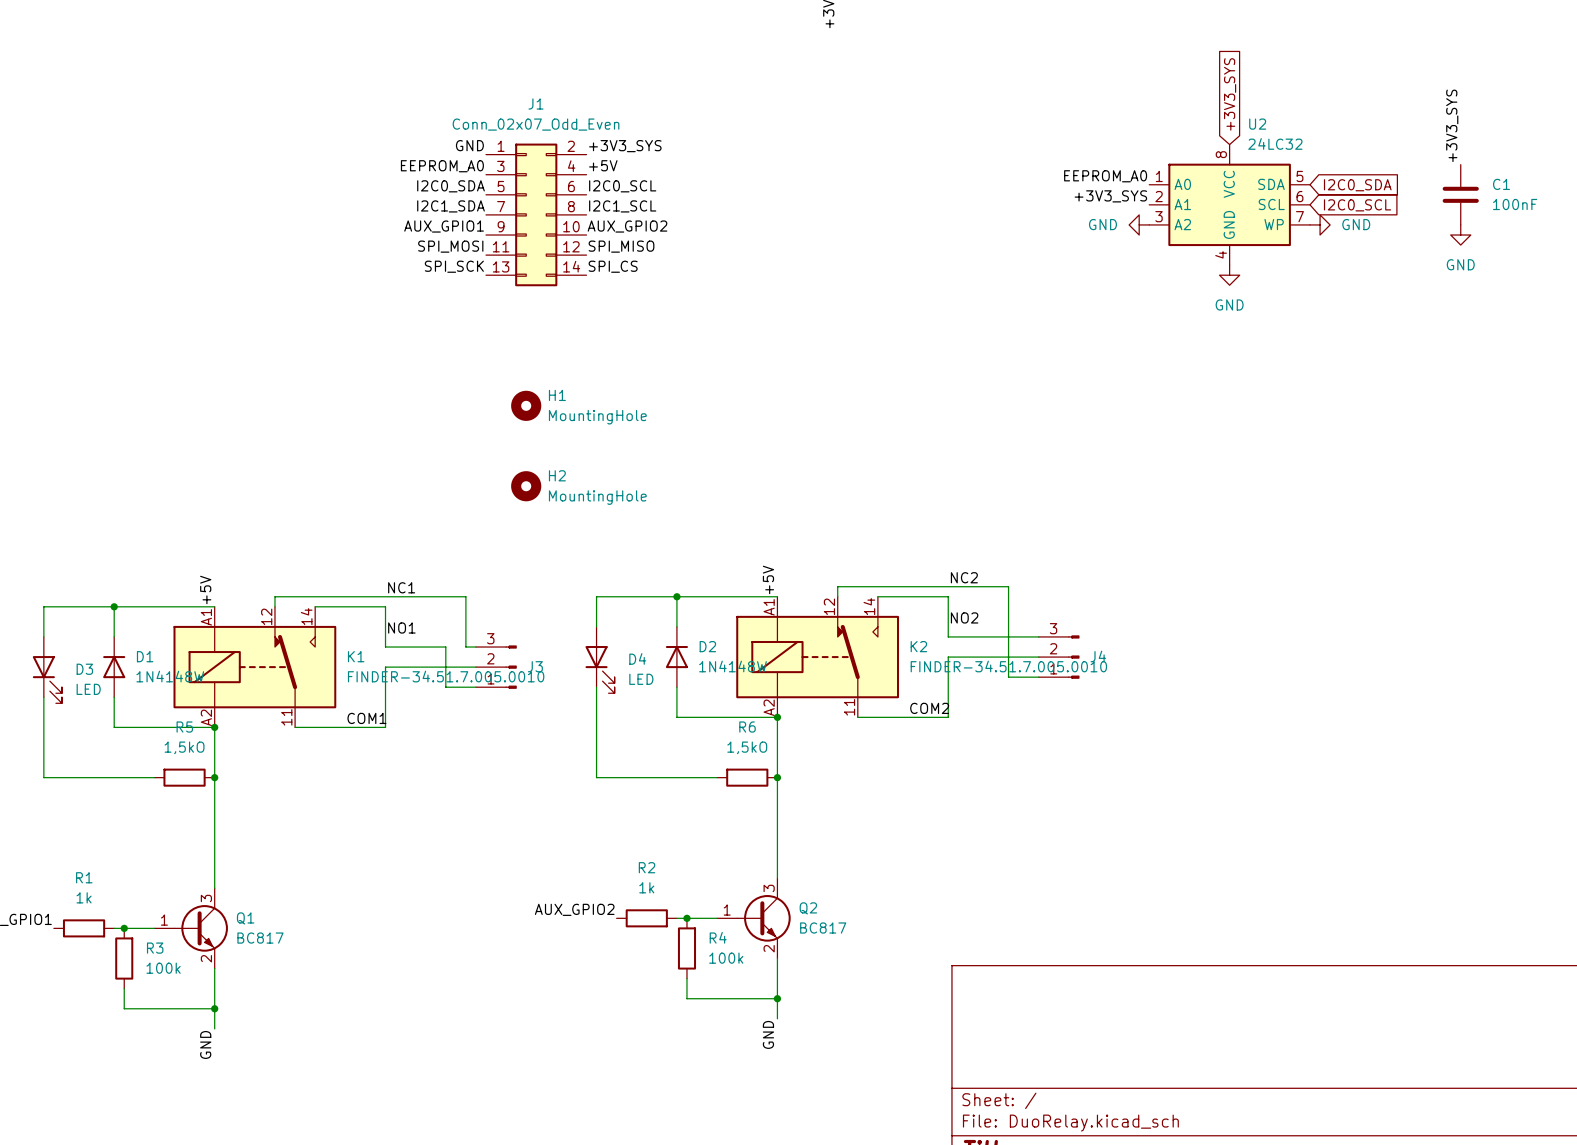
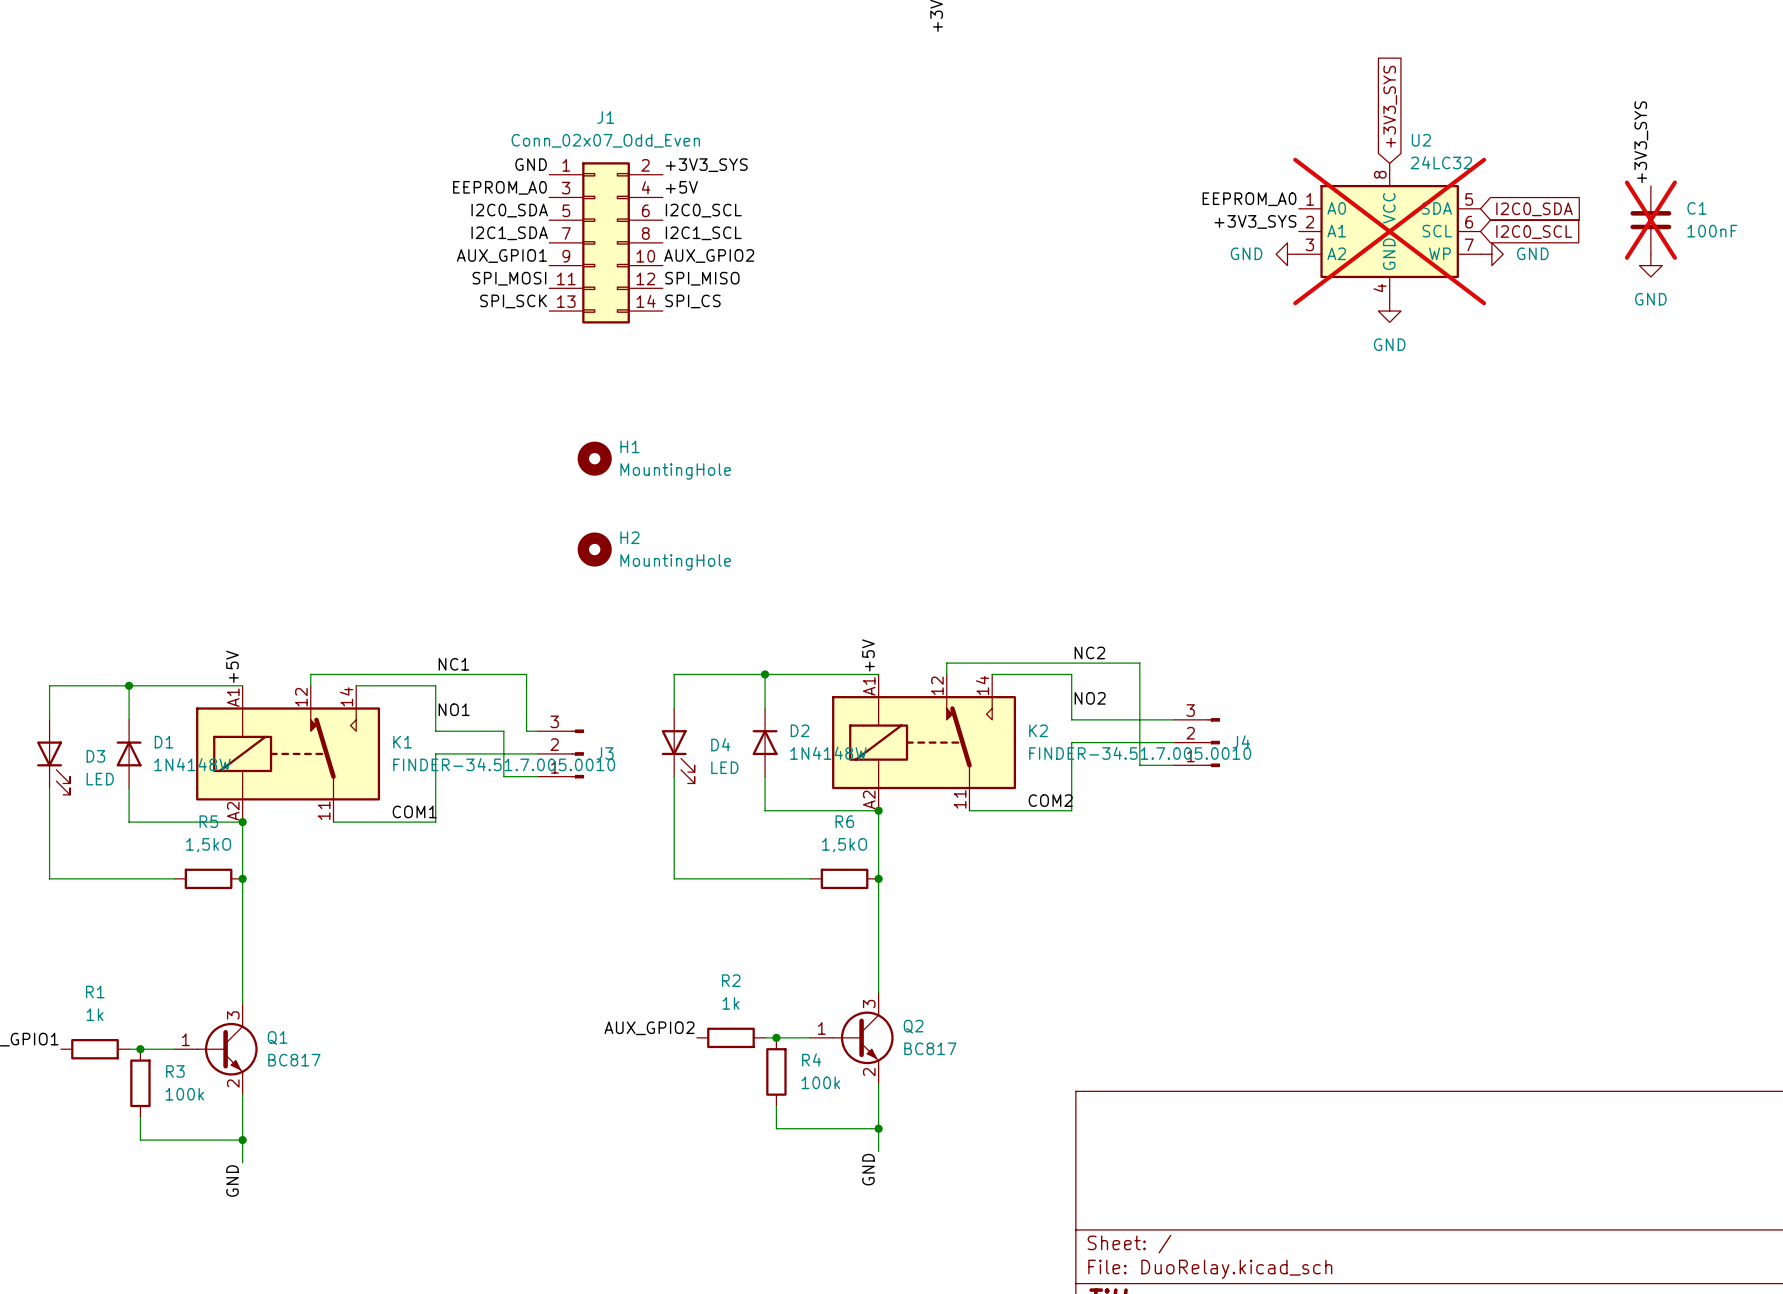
C1 do-not-place cross: none -> (1650, 220)
U2 do-not-place cross: none -> (1389, 231)

